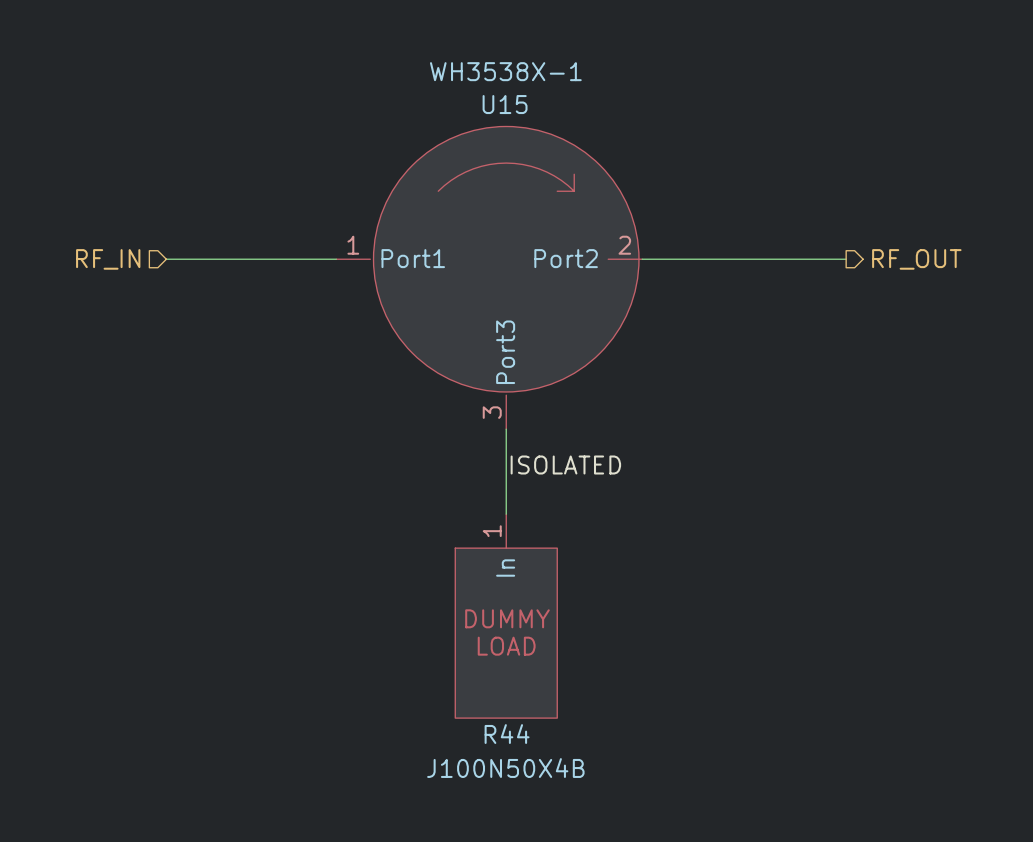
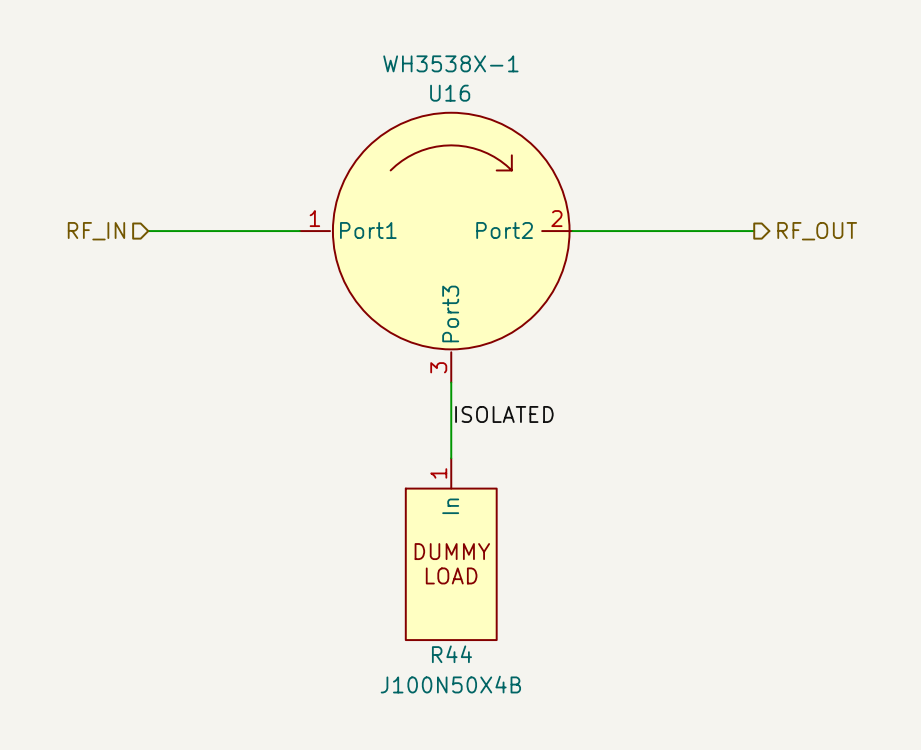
U15 name: U15 (505, 104) -> U16 (450, 93)

